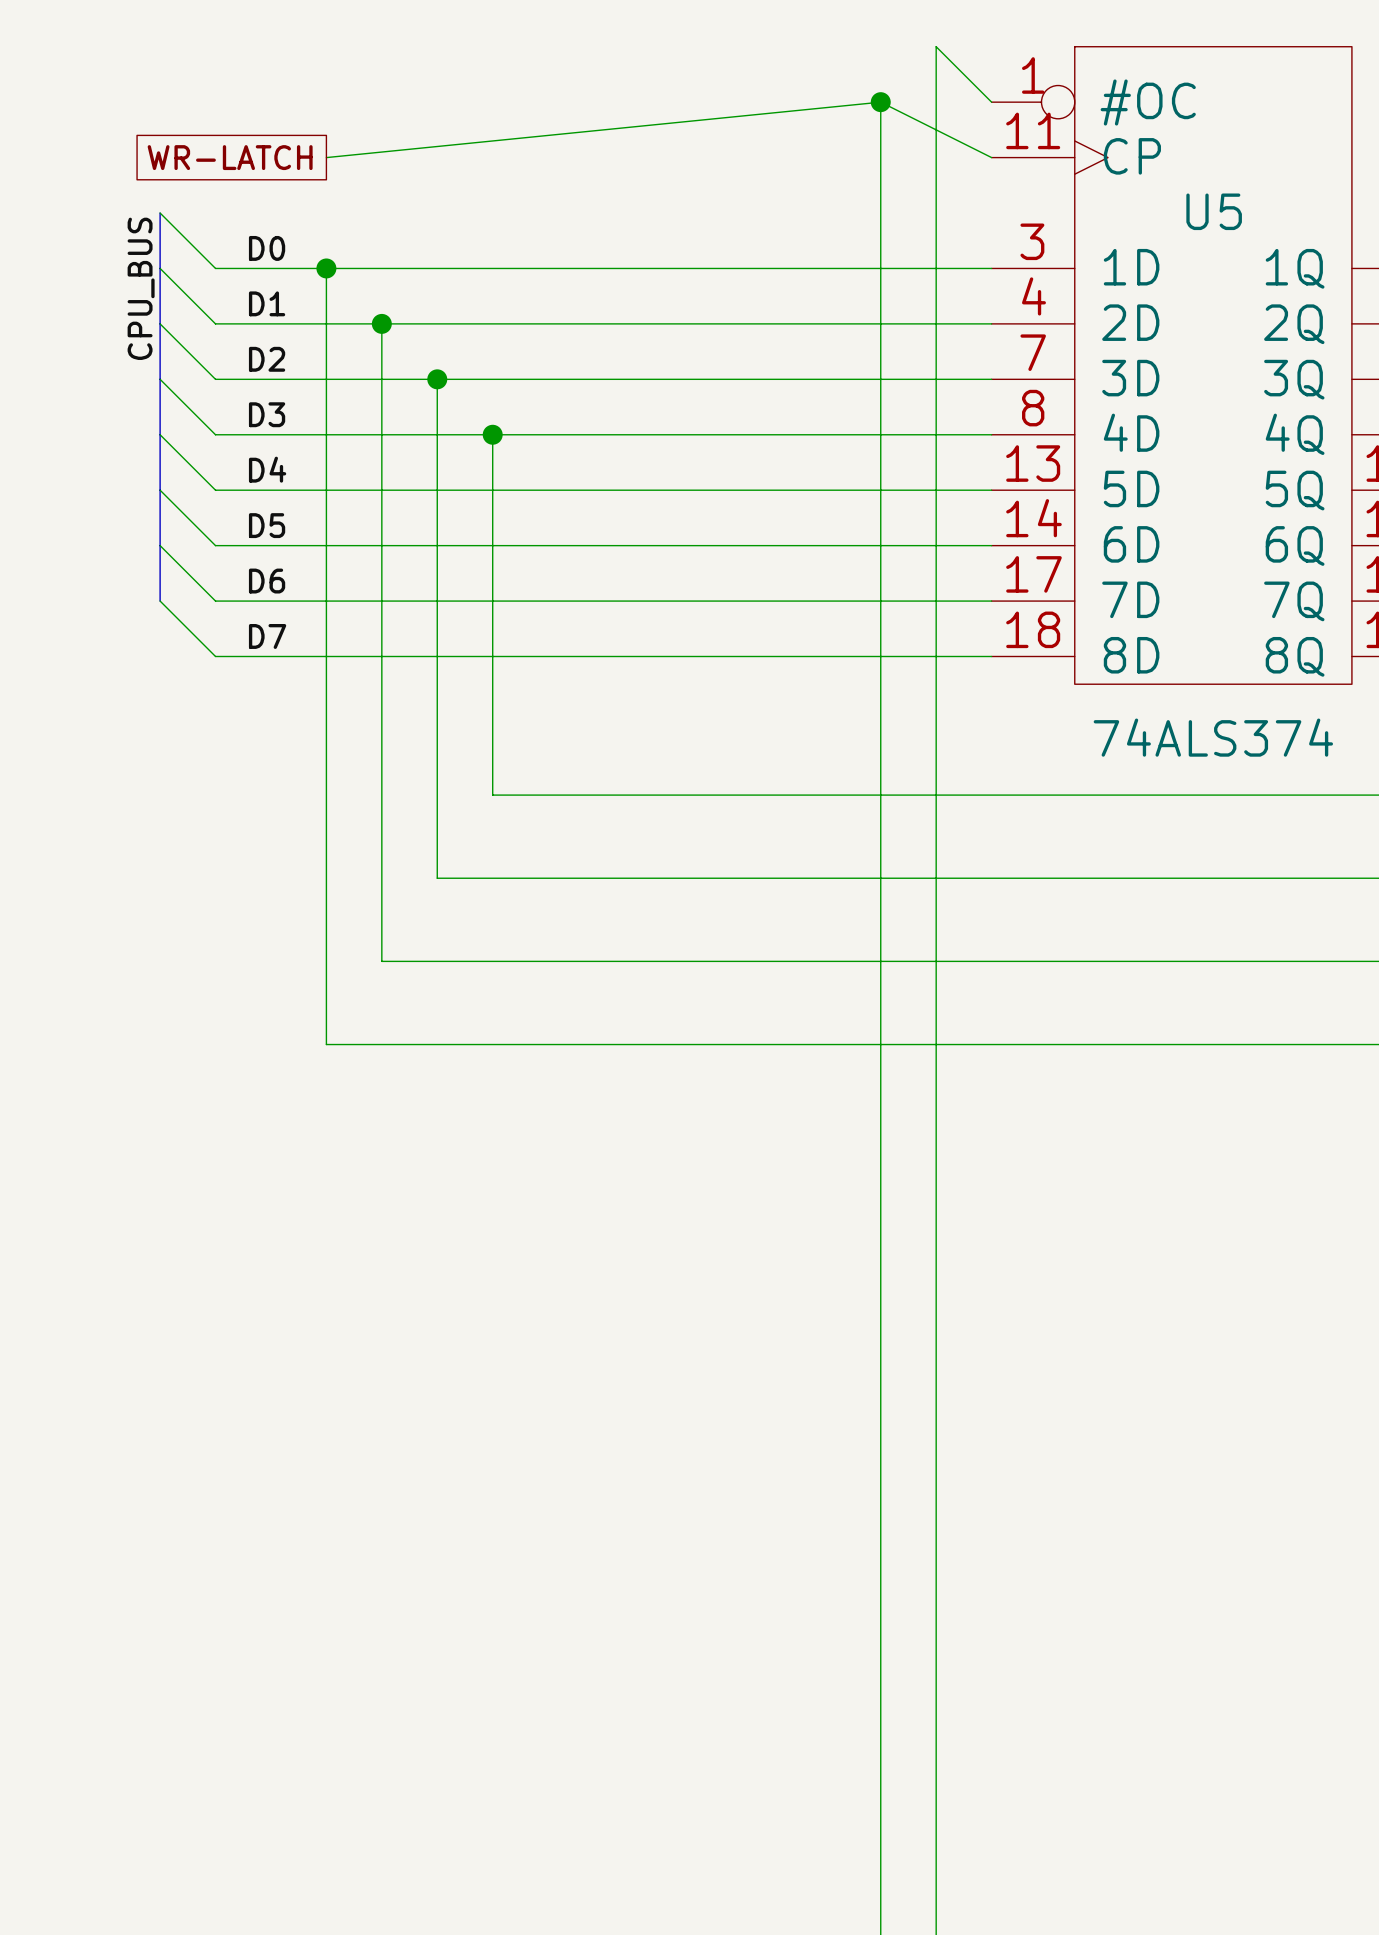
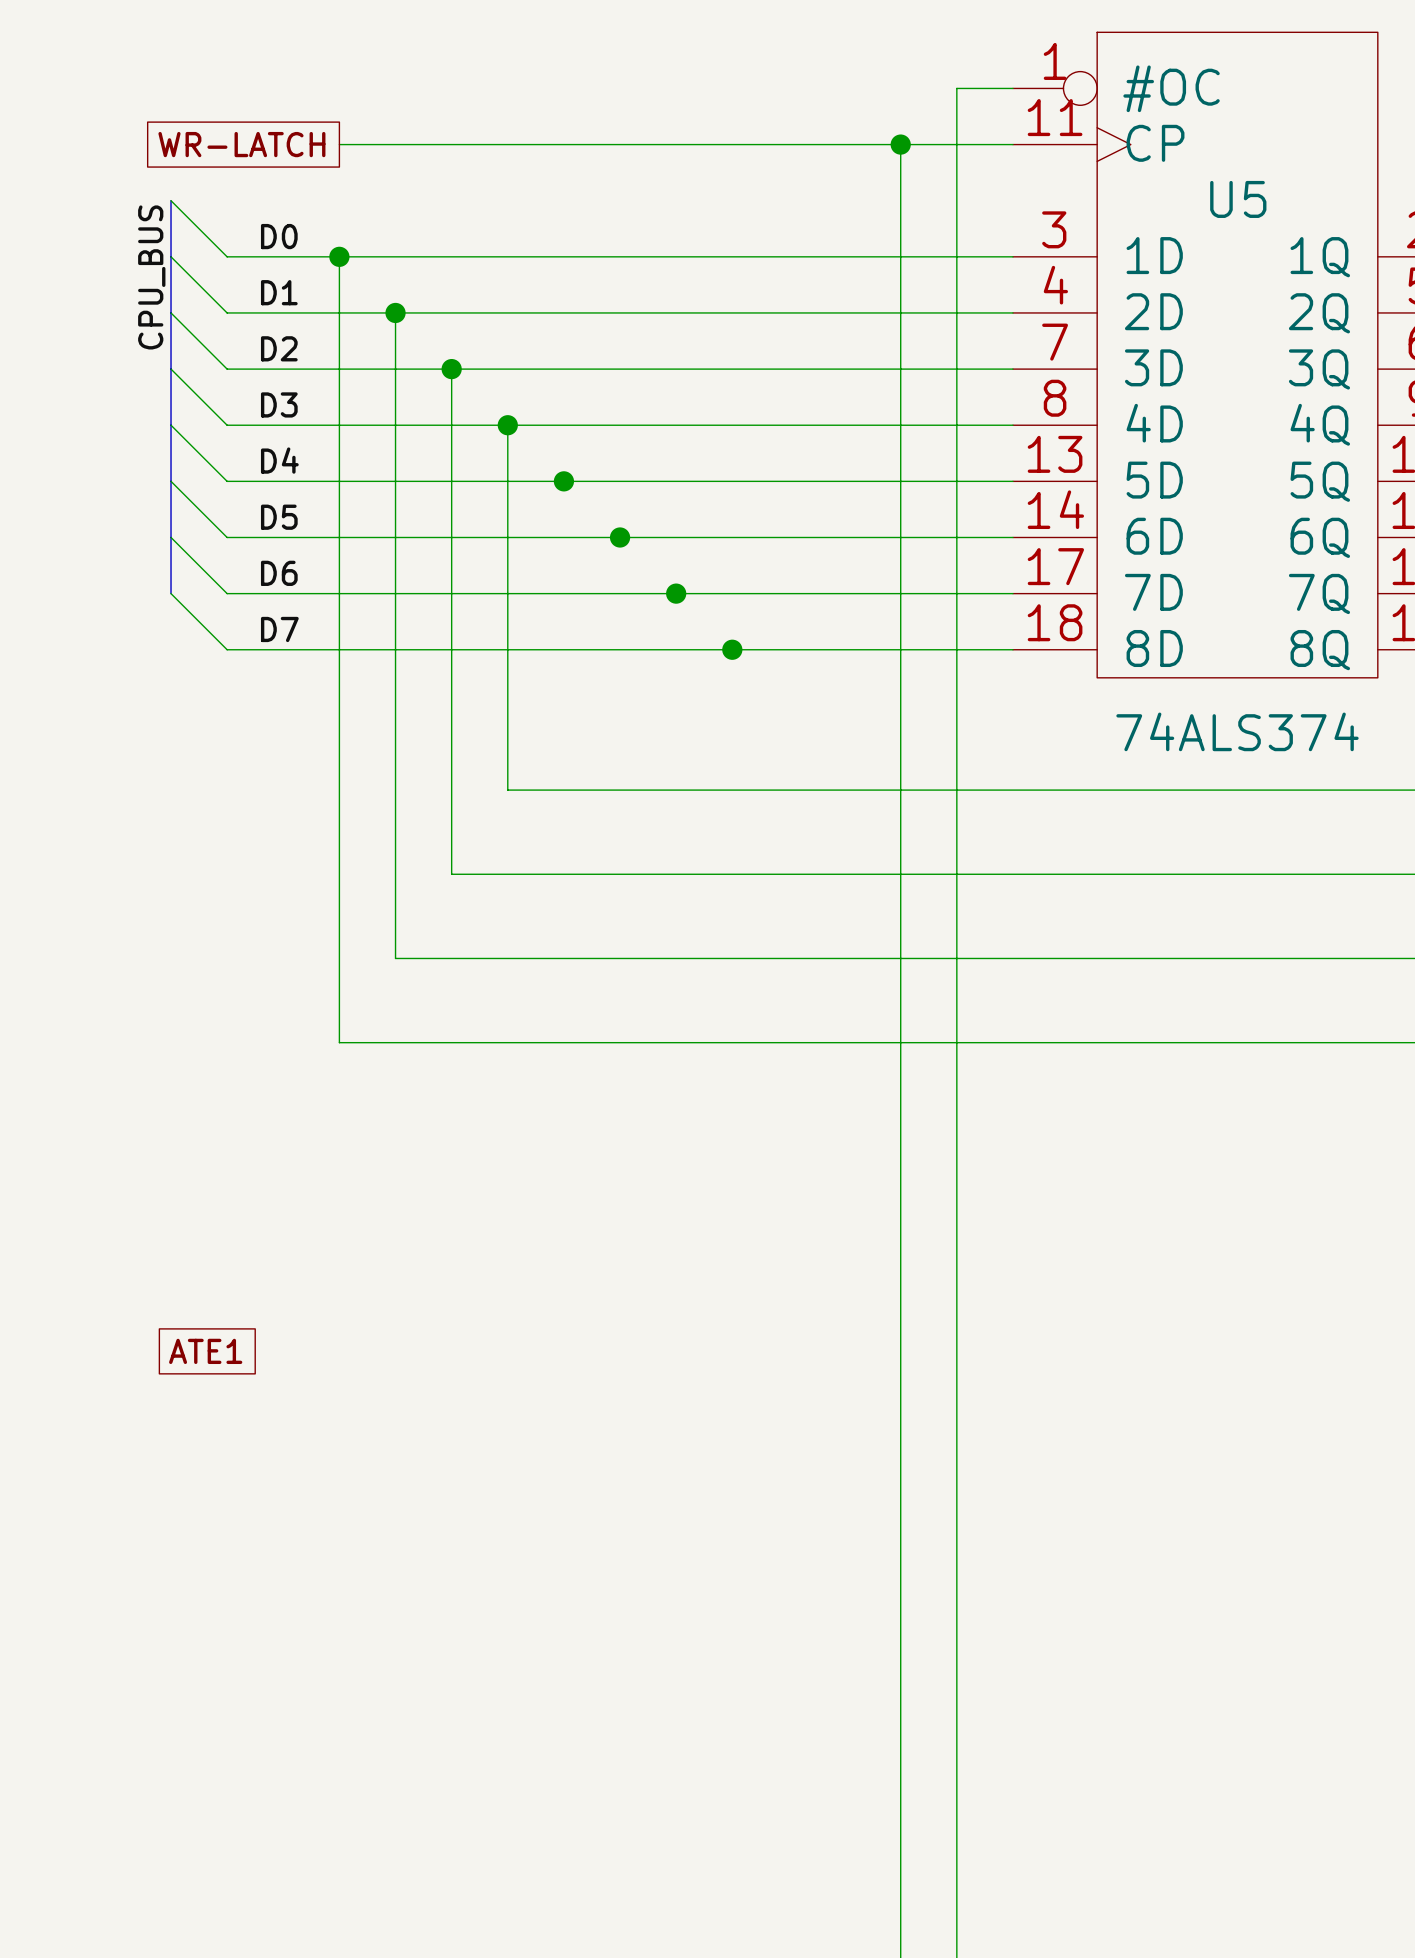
wire: (880, 102) (326, 157) -> (1012, 144) (339, 144)
wire: (880, 102) (991, 157) -> none
wire: (880, 102) (880, 157) -> none
junction position: (880, 102) -> (900, 144)
wire: (936, 102) (936, 46) (991, 102) -> (956, 88) (1012, 88)
junction: none -> (563, 481)
junction: none -> (620, 537)
junction: none -> (676, 593)
junction: none -> (732, 649)
global label: none -> ATE1 (205, 1351)

